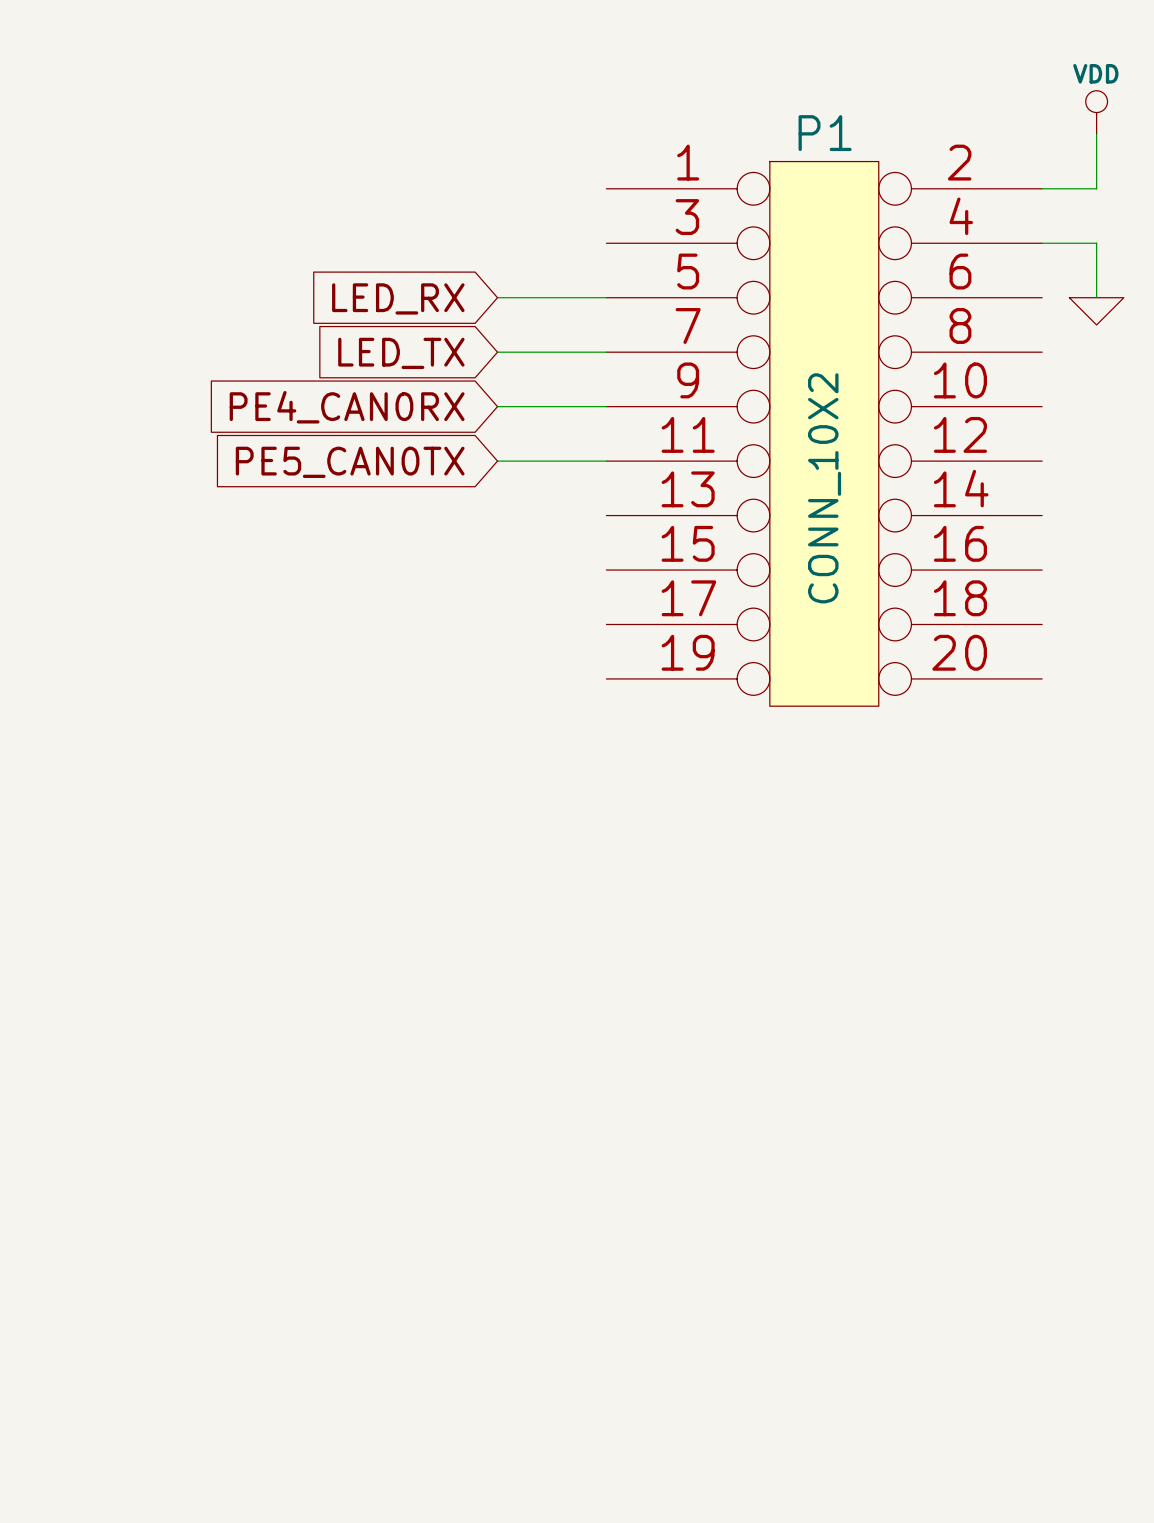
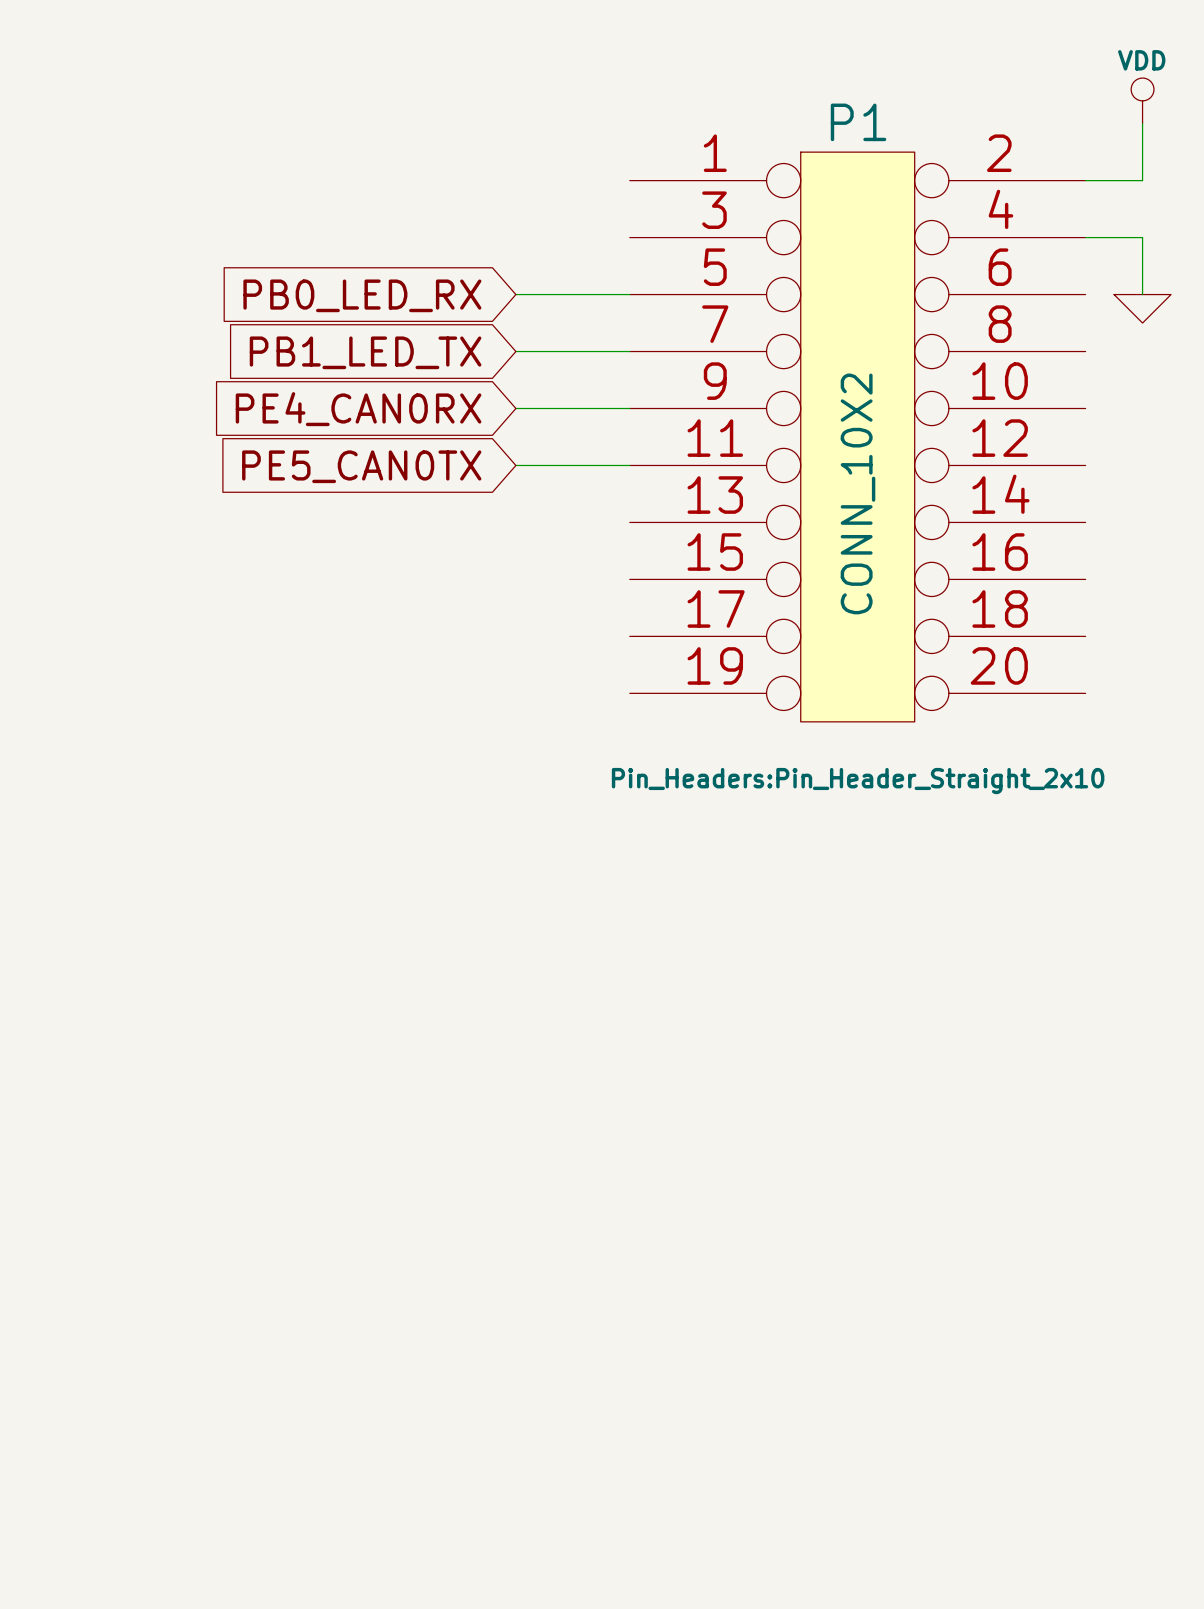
global label: LED_RX (398, 298) -> PB0_LED_RX (362, 295)
global label: LED_TX (401, 353) -> PB1_LED_TX (365, 352)
P1 text: none -> Pin_Headers:Pin_Header_Straight_2x10 (858, 781)

